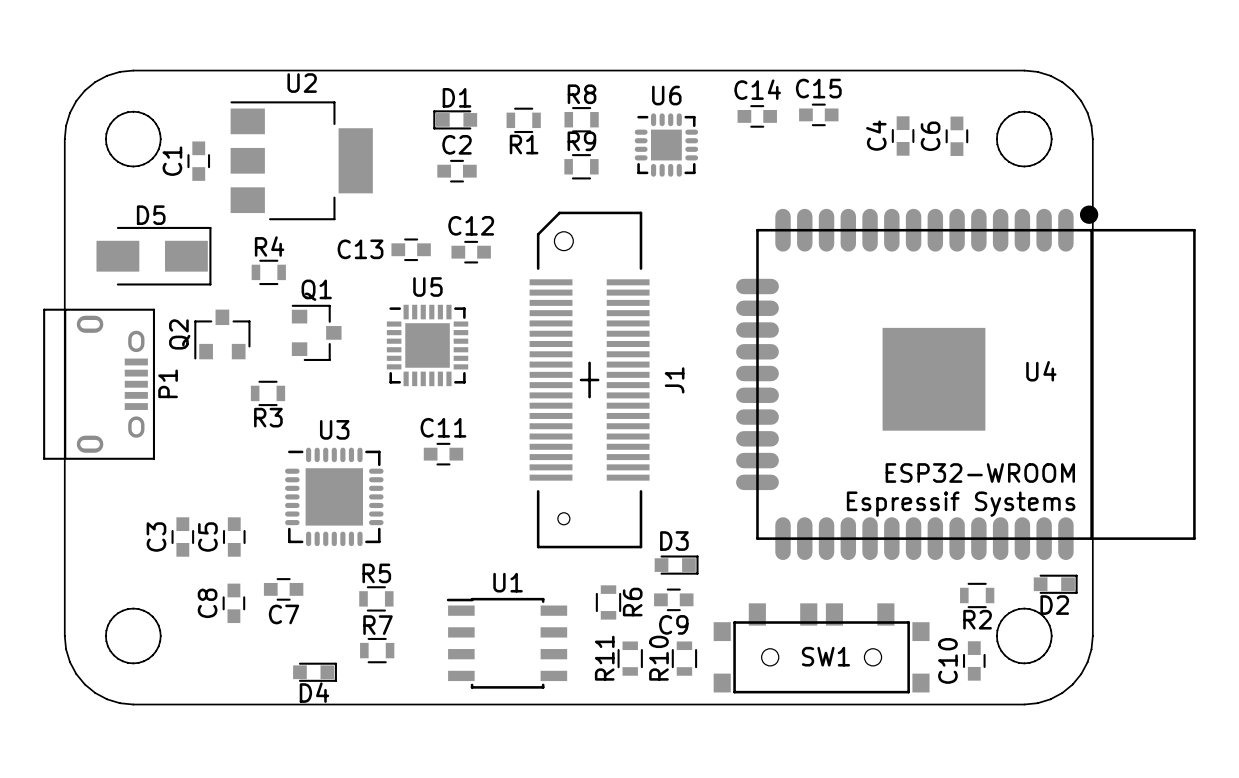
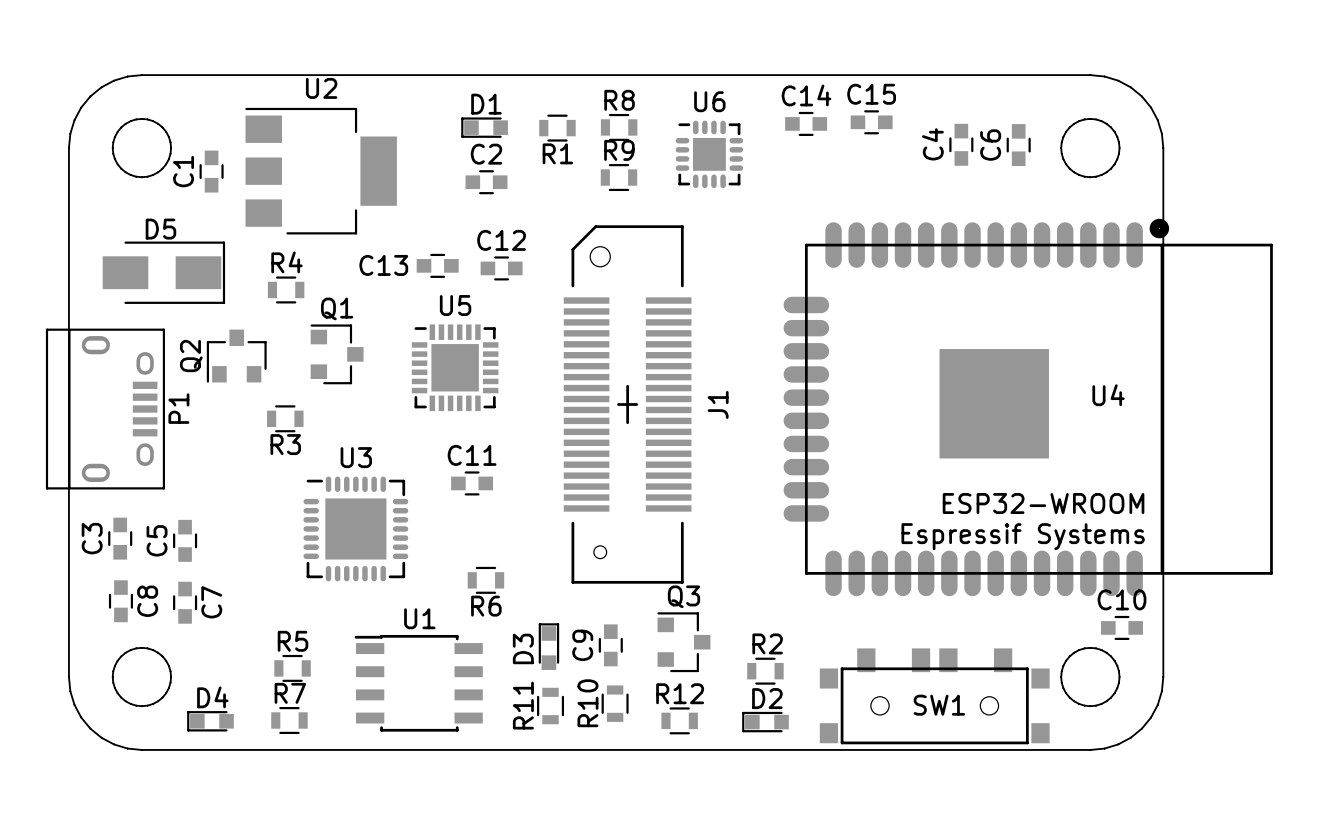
C3 position: (182, 537) -> (120, 538)
C5 position: (234, 537) -> (185, 540)
D3 rotation: 0° (676, 565) -> 90° counterclockwise (548, 646)
D3 position: (676, 565) -> (548, 646)
D2 rotation: 0° (1055, 584) -> 180° (765, 722)
D2 position: (1055, 584) -> (765, 722)
C7 rotation: 0° (283, 589) -> 90° clockwise (185, 602)
C7 position: (283, 589) -> (185, 602)
R2 position: (977, 595) -> (765, 671)
R5 position: (376, 598) -> (292, 668)
C9 rotation: 0° (673, 599) -> 90° clockwise (610, 645)
C9 position: (673, 599) -> (610, 645)
R6 rotation: 0° (608, 602) -> 90° clockwise (485, 580)
R6 position: (608, 602) -> (485, 580)
C8 name position: C8 (207, 603) -> C8 (147, 601)
C8 position: (233, 603) -> (120, 601)
Q3: none -> (683, 642)
C7 name position: C7 (284, 614) -> C7 (211, 602)
R2 name position: R2 (977, 619) -> R2 (767, 643)
U1 position: (506, 643) -> (418, 683)
SW1 position: (821, 648) -> (934, 696)
R7 position: (377, 650) -> (289, 720)
R11 position: (630, 658) -> (550, 706)
R10 position: (684, 658) -> (615, 703)
C10 rotation: 0° (974, 660) -> 90° clockwise (1122, 627)
C10 position: (974, 660) -> (1122, 627)
D4 rotation: 0° (315, 672) -> 180° (210, 721)
D4 position: (315, 672) -> (210, 721)
R12: none -> (679, 720)

